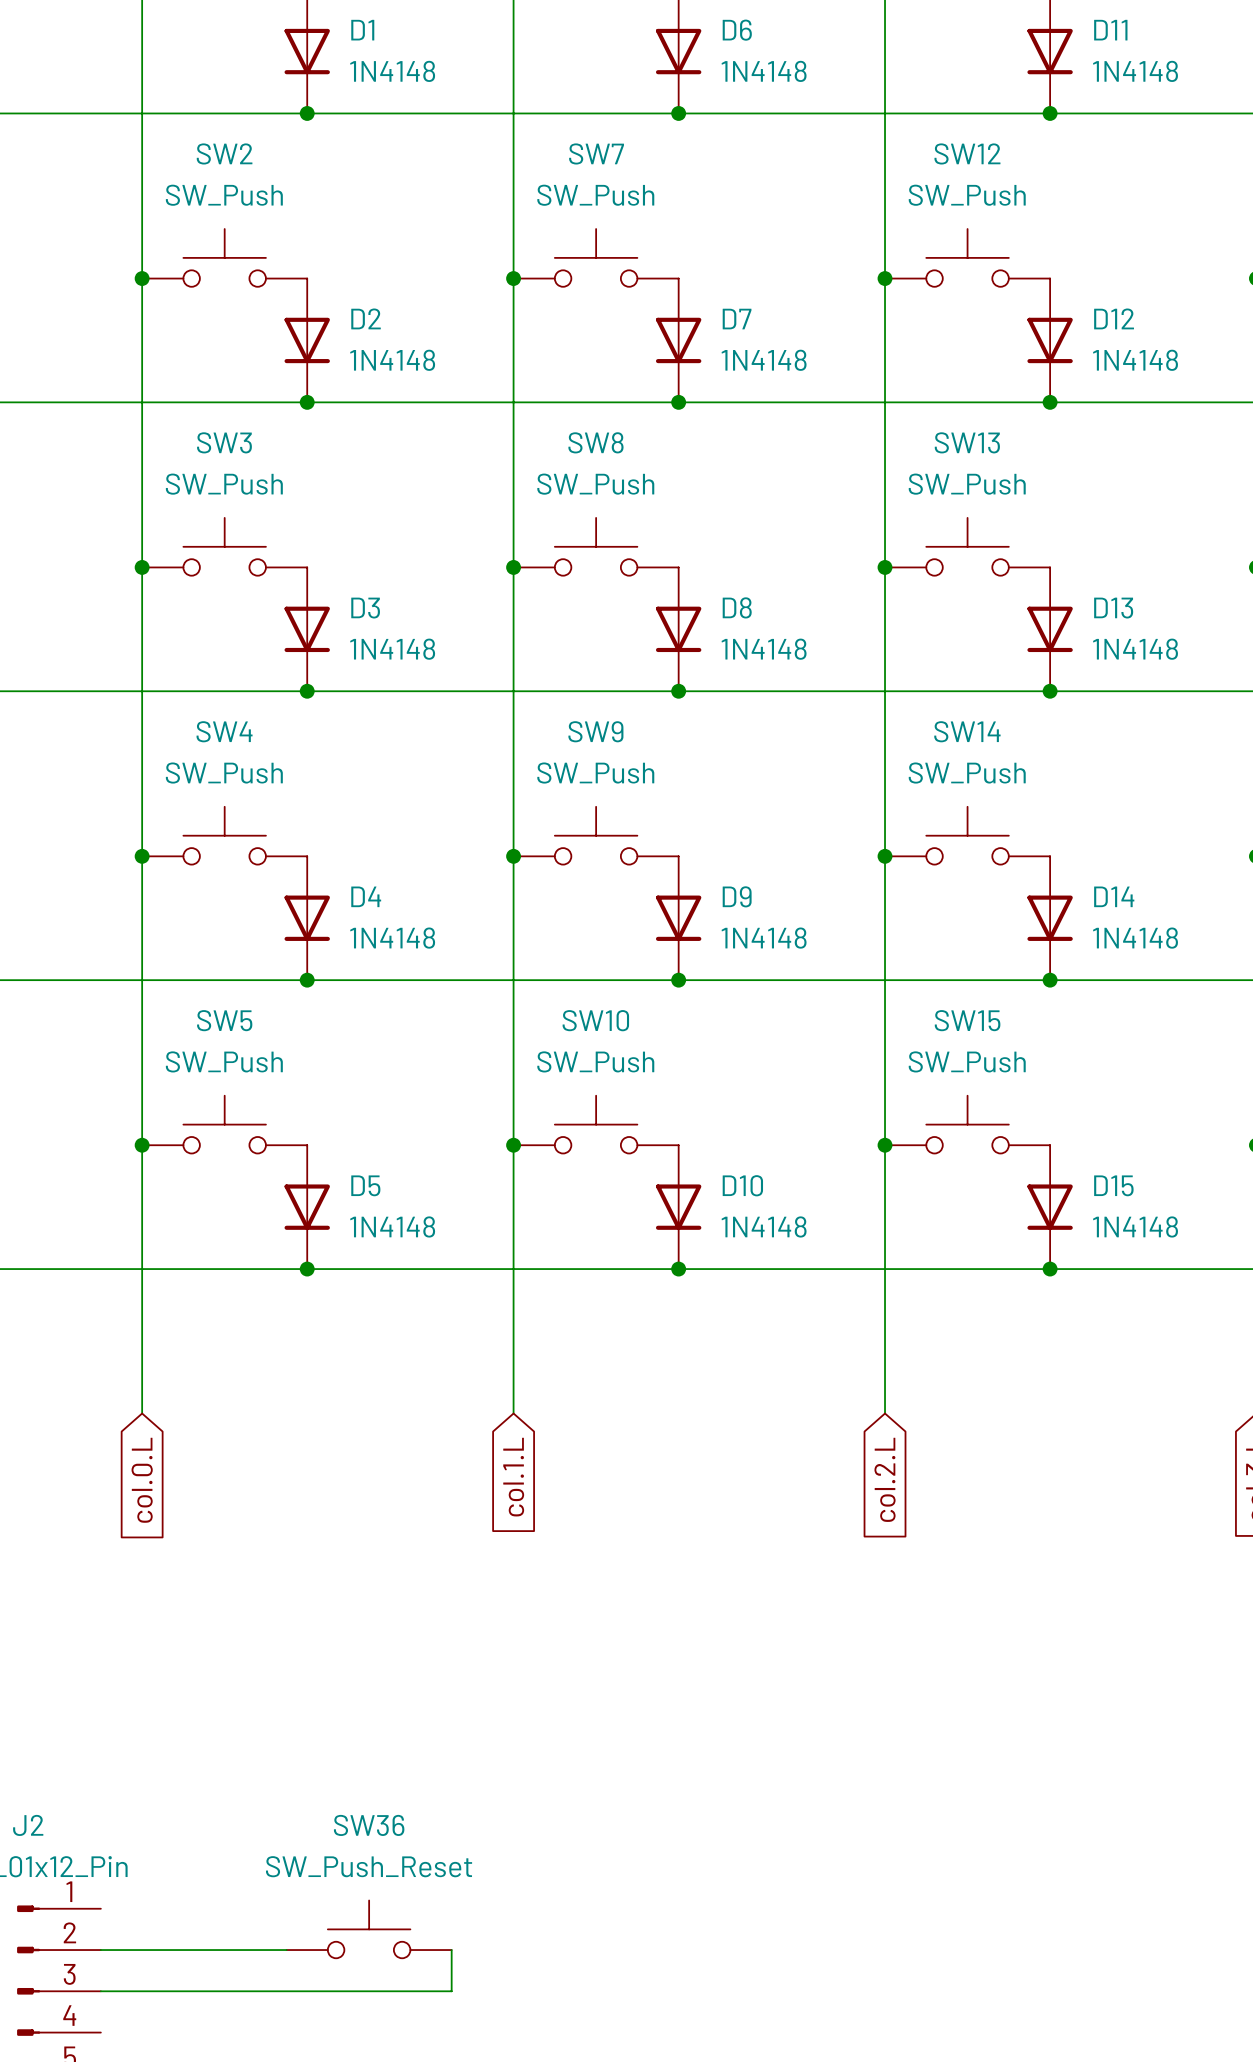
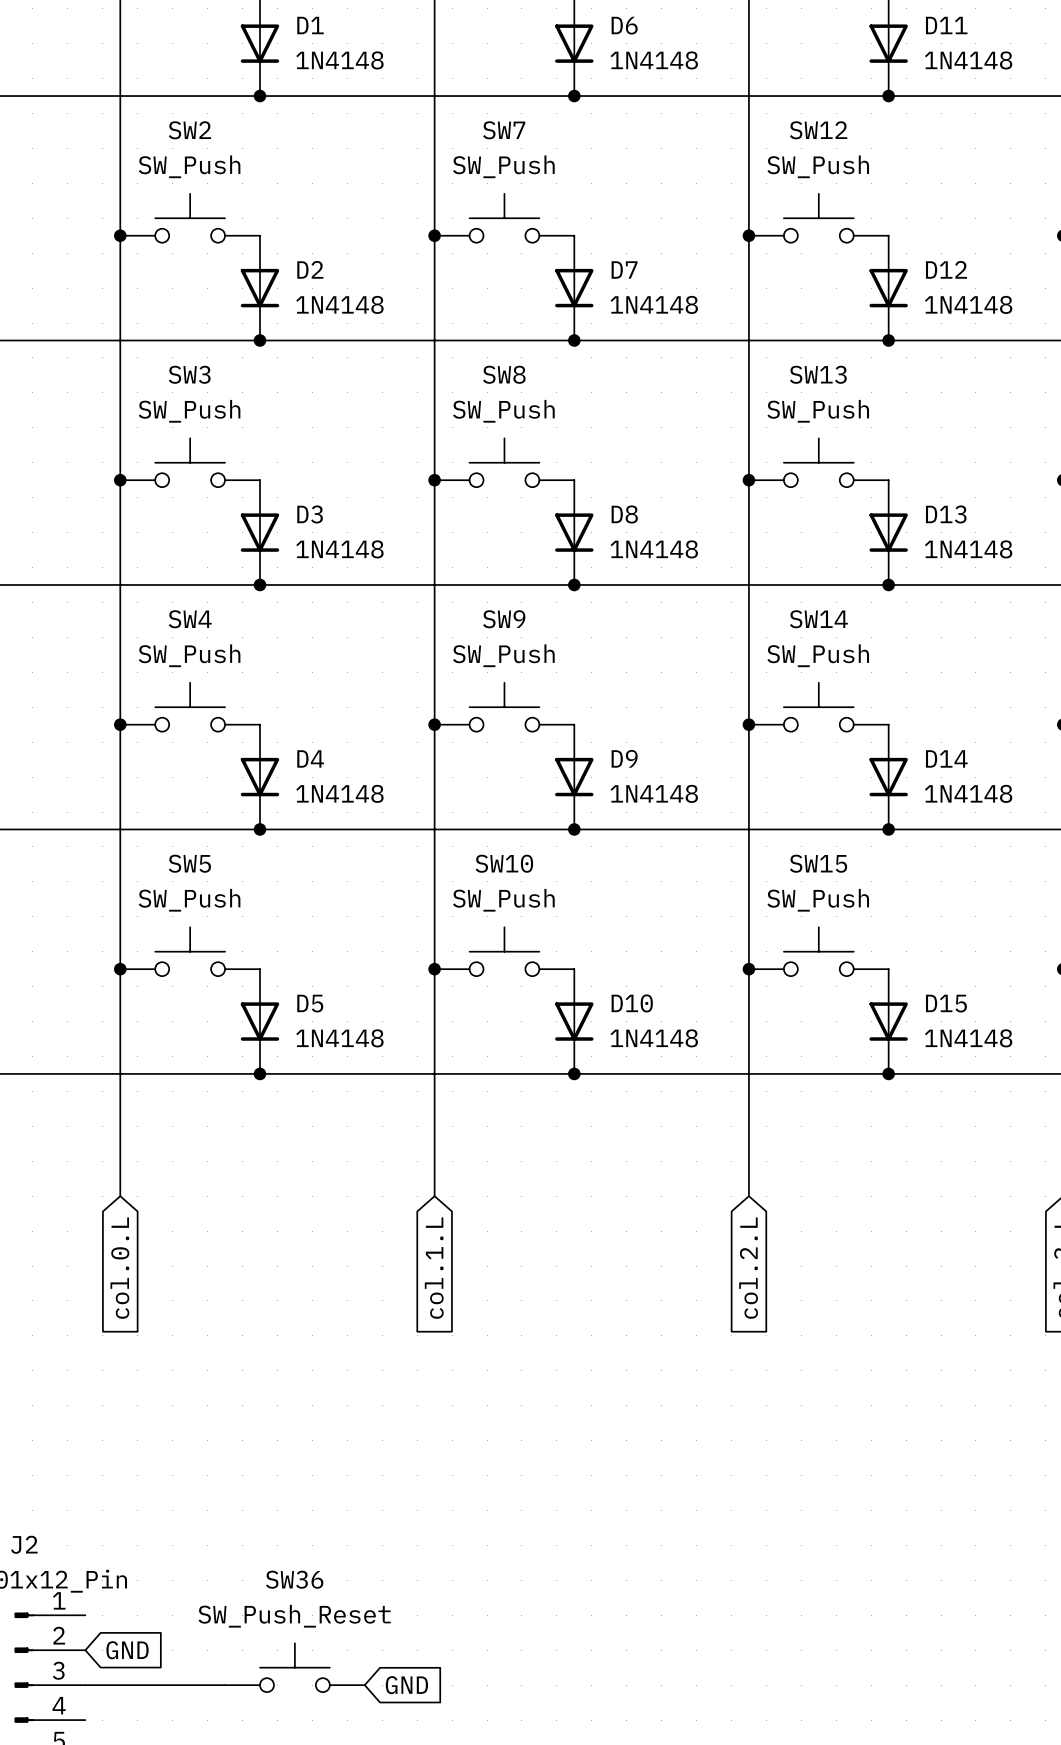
SW36 position: (369, 1929) -> (294, 1667)
wire: (100, 1950) (286, 1950) -> none
global label: none -> GND (127, 1650)
wire: (451, 1950) (451, 1991) (265, 1991) -> none
global label: none -> GND (406, 1685)

